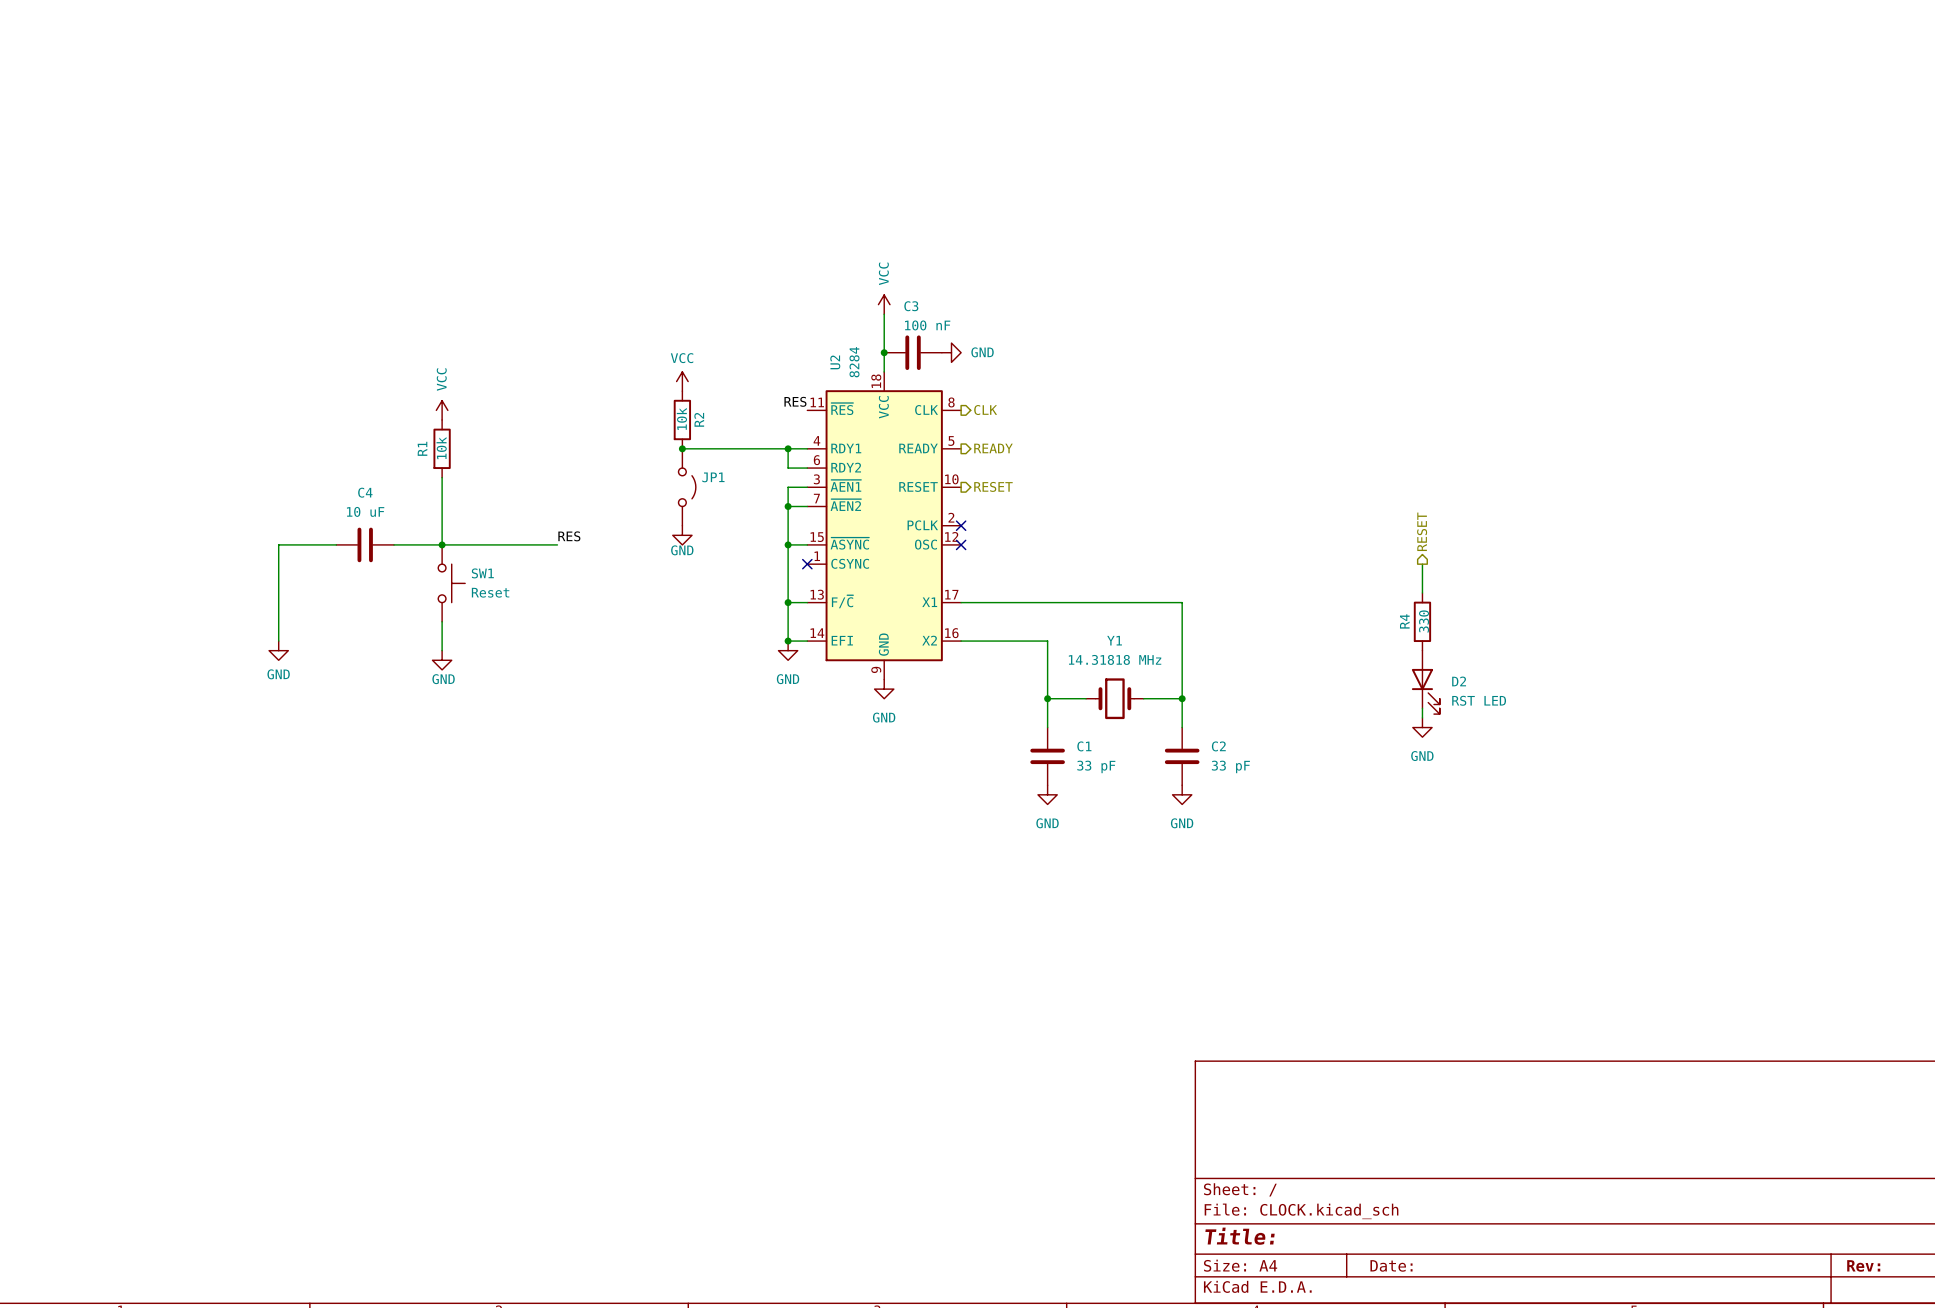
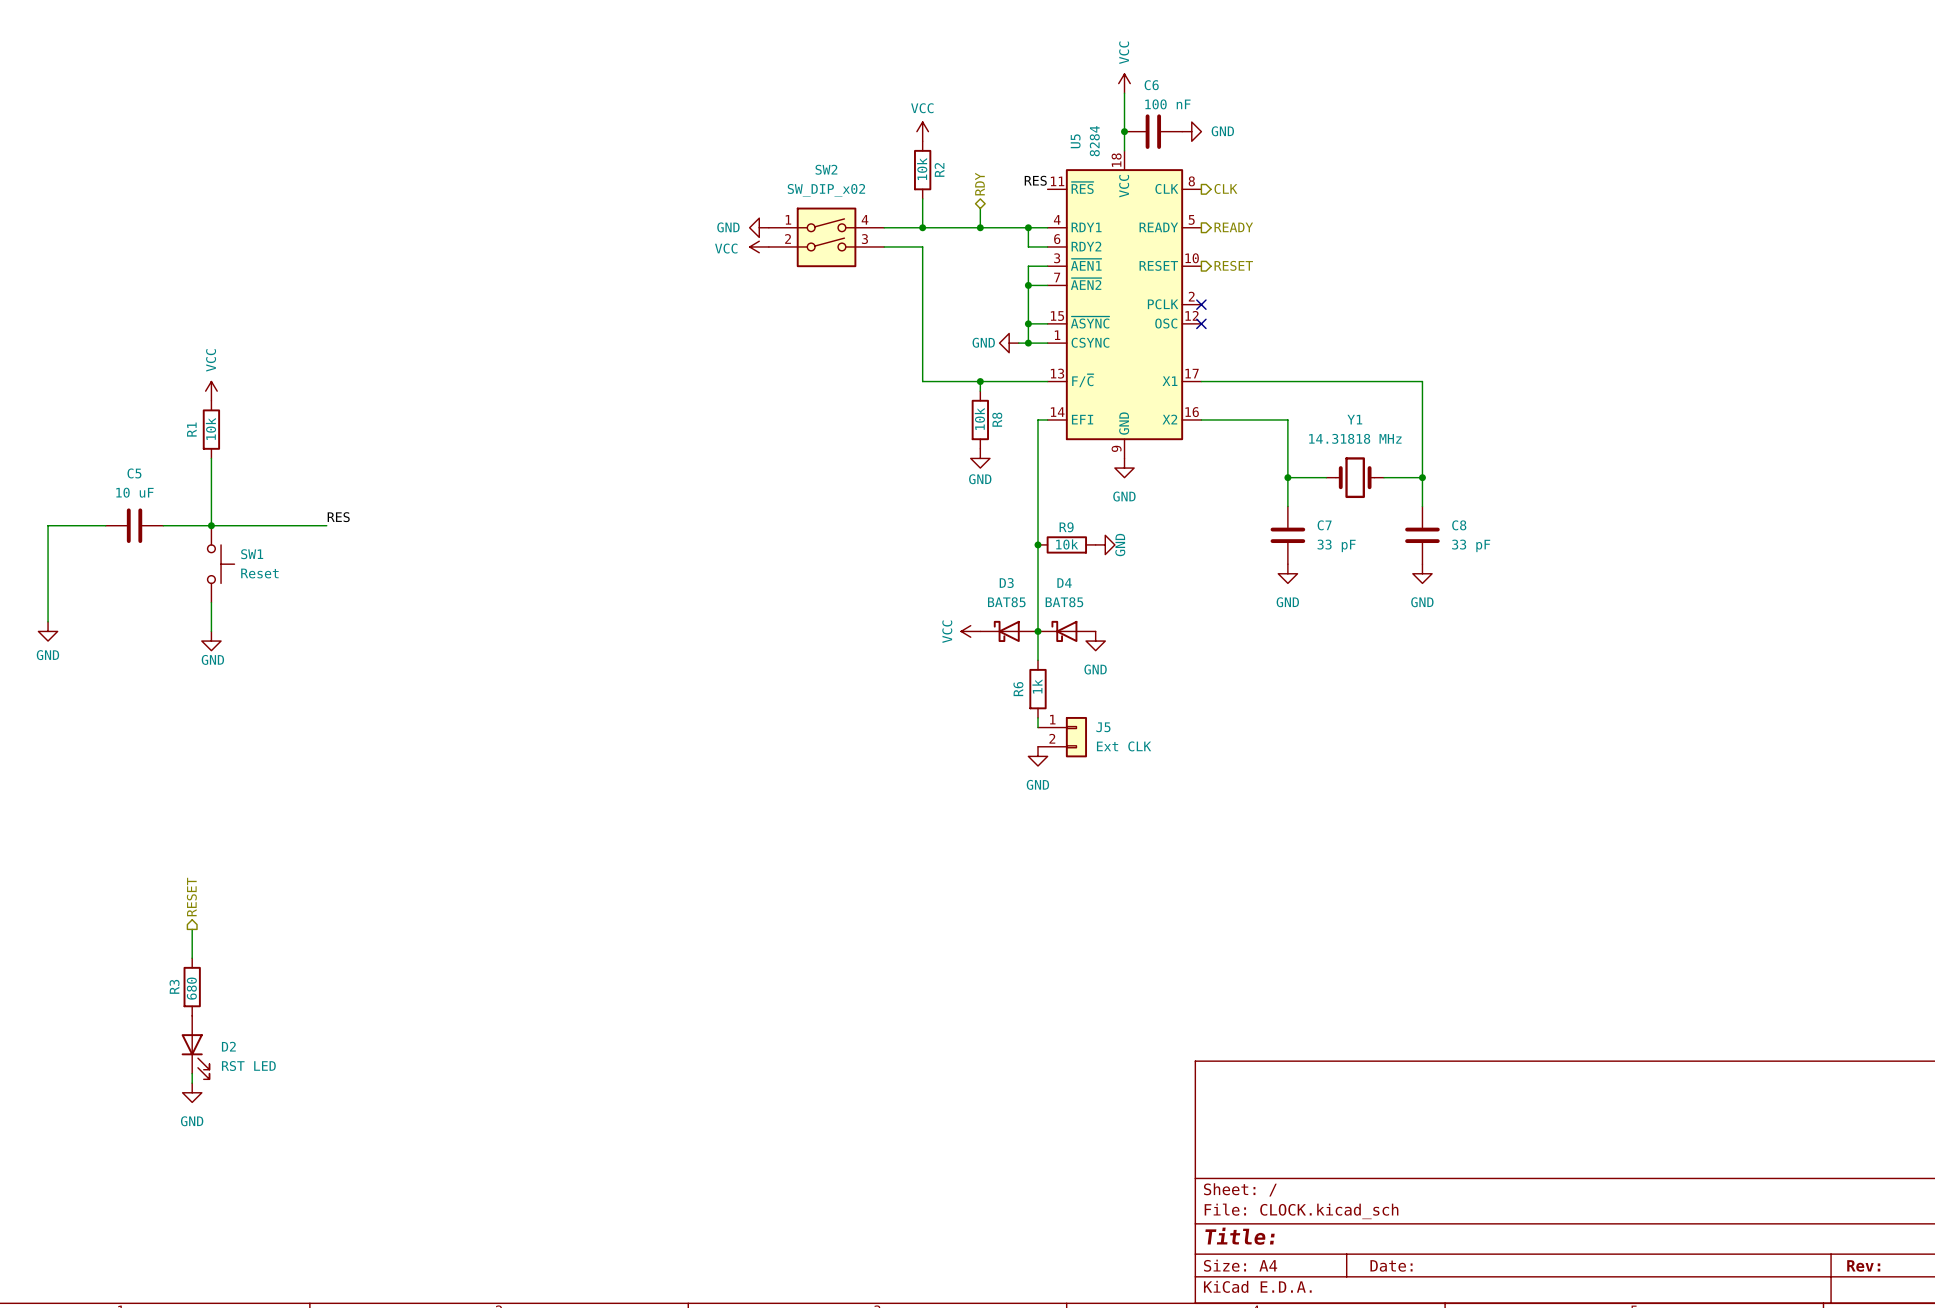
power symbol: none -> VCC (1124, 83)
wire: none -> (1124, 93) (1124, 150)
power symbol: none -> VCC (922, 131)
junction: none -> (1124, 131)
C6: none -> 100 nF (1153, 131)
power symbol: none -> GND (1191, 131)
label: none -> RES (1035, 180)
hierarchical label: none -> RDY (979, 184)
hierarchical label: none -> CLK (1225, 188)
wire: none -> (922, 198) (922, 227)
wire: none -> (980, 208) (980, 227)
power symbol: none -> GND (759, 227)
wire: none -> (884, 227) (1047, 227)
junction: none -> (922, 227)
junction: none -> (980, 227)
wire: none -> (1028, 227) (1028, 246) (1047, 246)
junction: none -> (1028, 227)
hierarchical label: none -> READY (1233, 227)
SW2: none -> SW_DIP_x02 (826, 237)
power symbol: none -> VCC (759, 246)
wire: none -> (884, 246) (922, 246) (922, 381) (1047, 381)
hierarchical label: none -> RESET (1233, 265)
wire: none -> (1047, 266) (1028, 266) (1028, 343)
wire: none -> (1028, 285) (1047, 285)
junction: none -> (1028, 285)
power symbol: VCC (884, 304) -> none
U5: none -> 8284 (1124, 304)
no-connect mark: none -> (1201, 304)
wire: (884, 314) (884, 371) -> none
wire: none -> (1028, 323) (1047, 323)
junction: none -> (1028, 323)
no-connect mark: none -> (1201, 323)
power symbol: none -> GND (1009, 343)
wire: none -> (1018, 343) (1047, 343)
junction: none -> (1028, 343)
junction: (884, 352) -> none
C3: 100 nF (913, 352) -> none
power symbol: GND (951, 352) -> none
power symbol: VCC (682, 381) -> none
wire: none -> (980, 381) (980, 391)
junction: none -> (980, 381)
wire: none -> (1201, 381) (1422, 381) (1422, 506)
power symbol: none -> VCC (211, 391)
label: RES (795, 401) -> none
power symbol: VCC (442, 410) -> none
hierarchical label: CLK (985, 410) -> none
R2 position: (682, 419) -> (922, 170)
R8: none -> 10k (980, 419)
wire: none -> (1047, 419) (1038, 419) (1038, 660)
wire: none -> (1201, 419) (1287, 419) (1287, 506)
R1 position: (442, 448) -> (211, 429)
wire: (682, 448) (807, 448) -> none
junction: (682, 448) -> none
wire: (788, 448) (788, 468) (807, 468) -> none
junction: (788, 448) -> none
hierarchical label: READY (993, 448) -> none
wire: none -> (211, 458) (211, 525)
power symbol: none -> GND (980, 458)
power symbol: none -> GND (1124, 468)
wire: (442, 477) (442, 544) -> none
wire: none -> (1287, 477) (1326, 477)
junction: none -> (1287, 477)
wire: none -> (1384, 477) (1422, 477)
junction: none -> (1422, 477)
hierarchical label: RESET (993, 486) -> none
JP1: (687, 487) -> none
wire: (807, 487) (788, 487) (788, 641) (807, 641) -> none
wire: (788, 506) (807, 506) -> none
junction: (788, 506) -> none
label: none -> RES (338, 517)
wire: none -> (105, 525) (48, 525) (48, 621)
C5: none -> 10 uF (134, 525)
wire: none -> (163, 525) (326, 525)
junction: none -> (211, 525)
U2: 8284 (884, 525) -> none
no-connect mark: (961, 525) -> none
hierarchical label: RESET (1422, 531) -> none
power symbol: GND (682, 535) -> none
C7: none -> 33 pF (1287, 535)
C8: none -> 33 pF (1422, 535)
label: RES (569, 536) -> none
wire: (336, 544) (278, 544) (278, 641) -> none
C4: 10 uF (365, 544) -> none
wire: (394, 544) (557, 544) -> none
junction: (442, 544) -> none
wire: (788, 544) (807, 544) -> none
junction: (788, 544) -> none
no-connect mark: (961, 544) -> none
junction: none -> (1038, 544)
R9: none -> 10k (1066, 544)
power symbol: none -> GND (1105, 544)
no-connect mark: (807, 564) -> none
wire: (1422, 564) (1422, 592) -> none
power symbol: none -> GND (1287, 573)
power symbol: none -> GND (1422, 573)
SW1 position: (451, 583) -> (221, 564)
wire: none -> (211, 602) (211, 631)
wire: (788, 602) (807, 602) -> none
junction: (788, 602) -> none
wire: (961, 602) (1182, 602) (1182, 727) -> none
wire: (442, 621) (442, 650) -> none
R4: 330 (1422, 621) -> none
power symbol: none -> GND (48, 631)
power symbol: none -> VCC (970, 631)
D3: none -> BAT85 (1009, 631)
junction: none -> (1038, 631)
D4: none -> BAT85 (1066, 631)
junction: (788, 641) -> none
wire: (961, 641) (1047, 641) (1047, 727) -> none
power symbol: none -> GND (1095, 641)
power symbol position: GND (278, 650) -> GND (211, 641)
power symbol: GND (788, 650) -> none
power symbol: GND (442, 660) -> none
power symbol text position: GND (278, 674) -> GND (212, 659)
D2 position: (1425, 682) -> (195, 1047)
power symbol: GND (884, 689) -> none
R6: none -> 1k (1038, 689)
wire: (1047, 698) (1086, 698) -> none
junction: (1047, 698) -> none
Y1 position: (1114, 698) -> (1355, 477)
wire: (1143, 698) (1182, 698) -> none
junction: (1182, 698) -> none
wire: (1422, 708) (1422, 717) -> none
wire: none -> (1038, 717) (1038, 727)
power symbol: GND (1422, 727) -> none
J5: none -> Ext CLK (1062, 737)
C1: 33 pF (1047, 756) -> none
C2: 33 pF (1182, 756) -> none
power symbol position: GND (1047, 794) -> GND (1038, 756)
power symbol: GND (1182, 794) -> none
hierarchical label: none -> RESET (191, 897)
wire: none -> (192, 929) (192, 958)
R3: none -> 680 (192, 987)
wire: none -> (192, 1073) (192, 1083)
power symbol: none -> GND (192, 1092)

